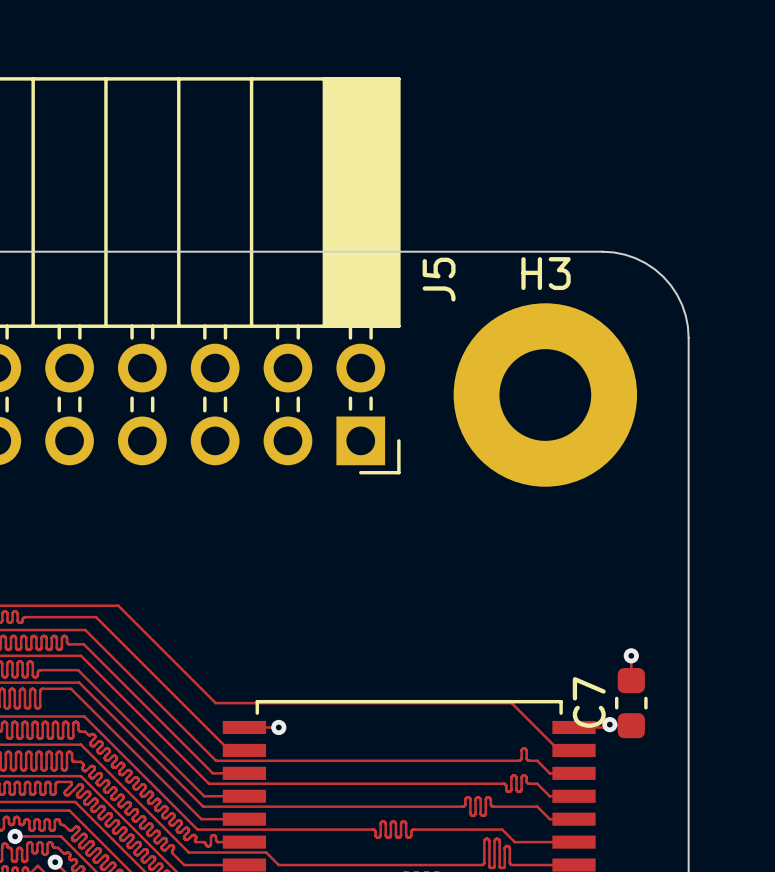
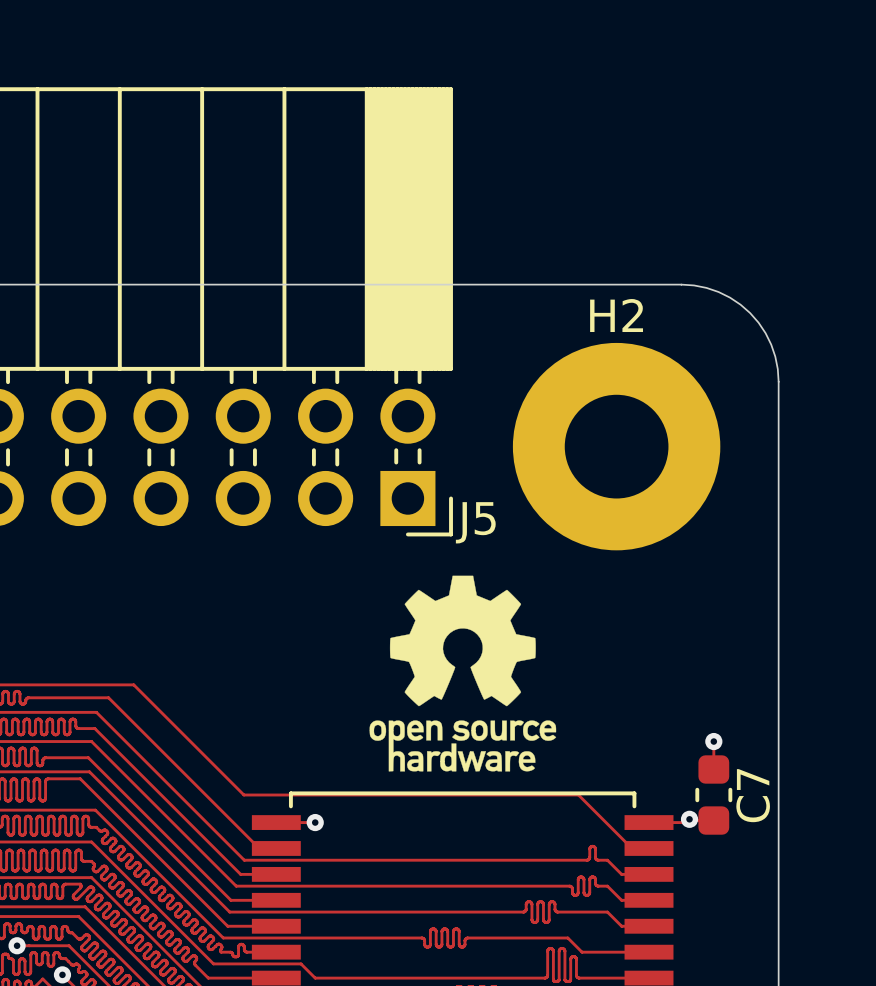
H3 name: H3 (546, 273) -> H2 (616, 315)
J5 name rotation: 0° (439, 279) -> 90° clockwise (475, 522)
J5 name position: J5 (439, 279) -> J5 (475, 522)
drawing: none -> [369, 575, 557, 772]
C7 name position: C7 (589, 702) -> C7 (753, 795)

